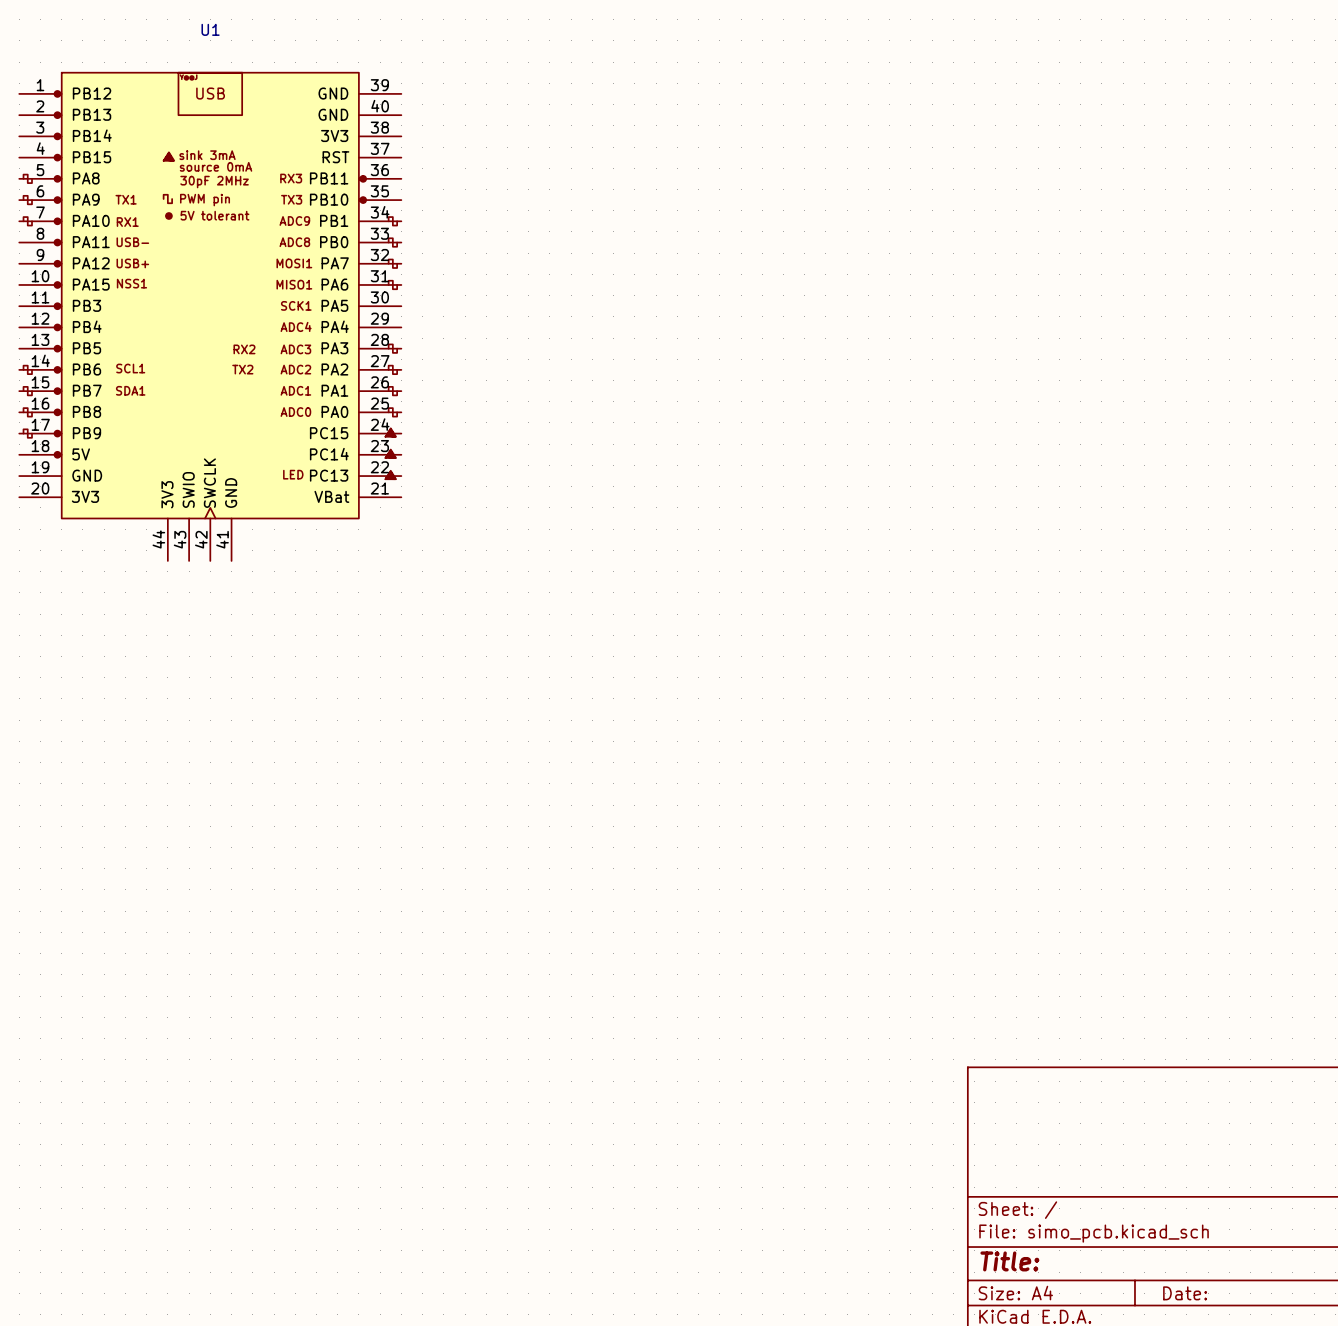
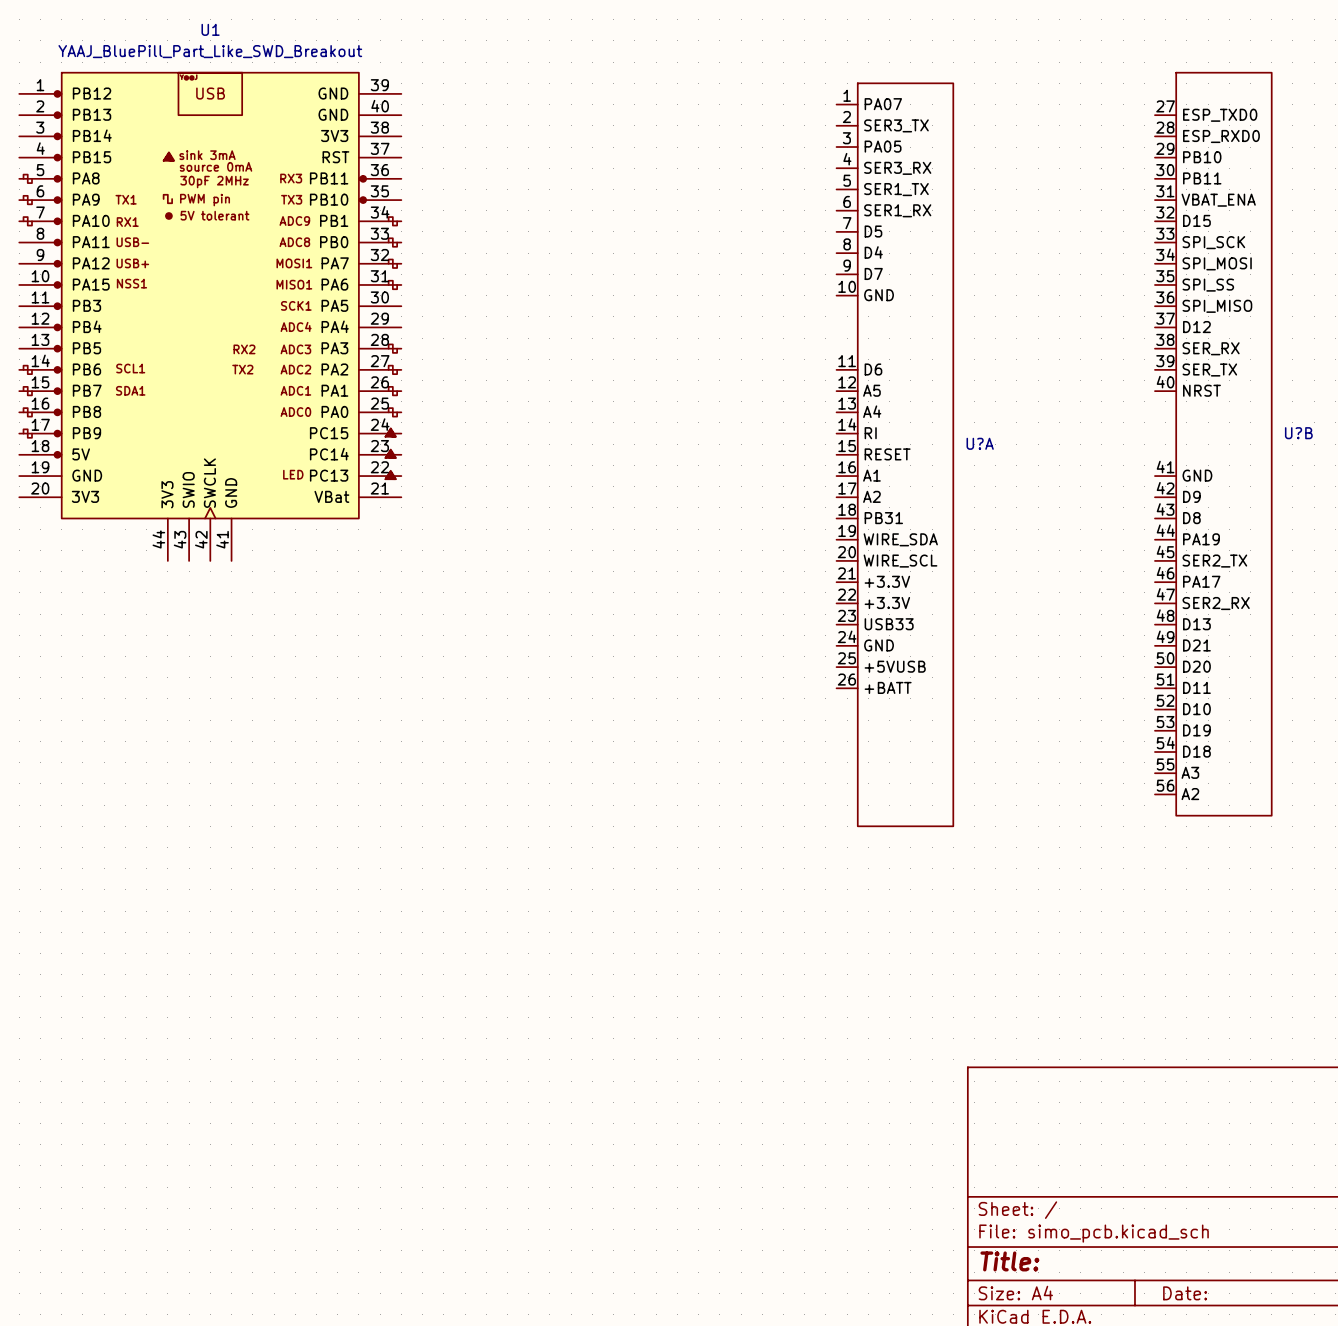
U1 value: none -> YAAJ_BluePill_Part_Like_SWD_Breakout (210, 51)
U?B: none -> (1027, 444)
U?A: none -> (709, 454)

